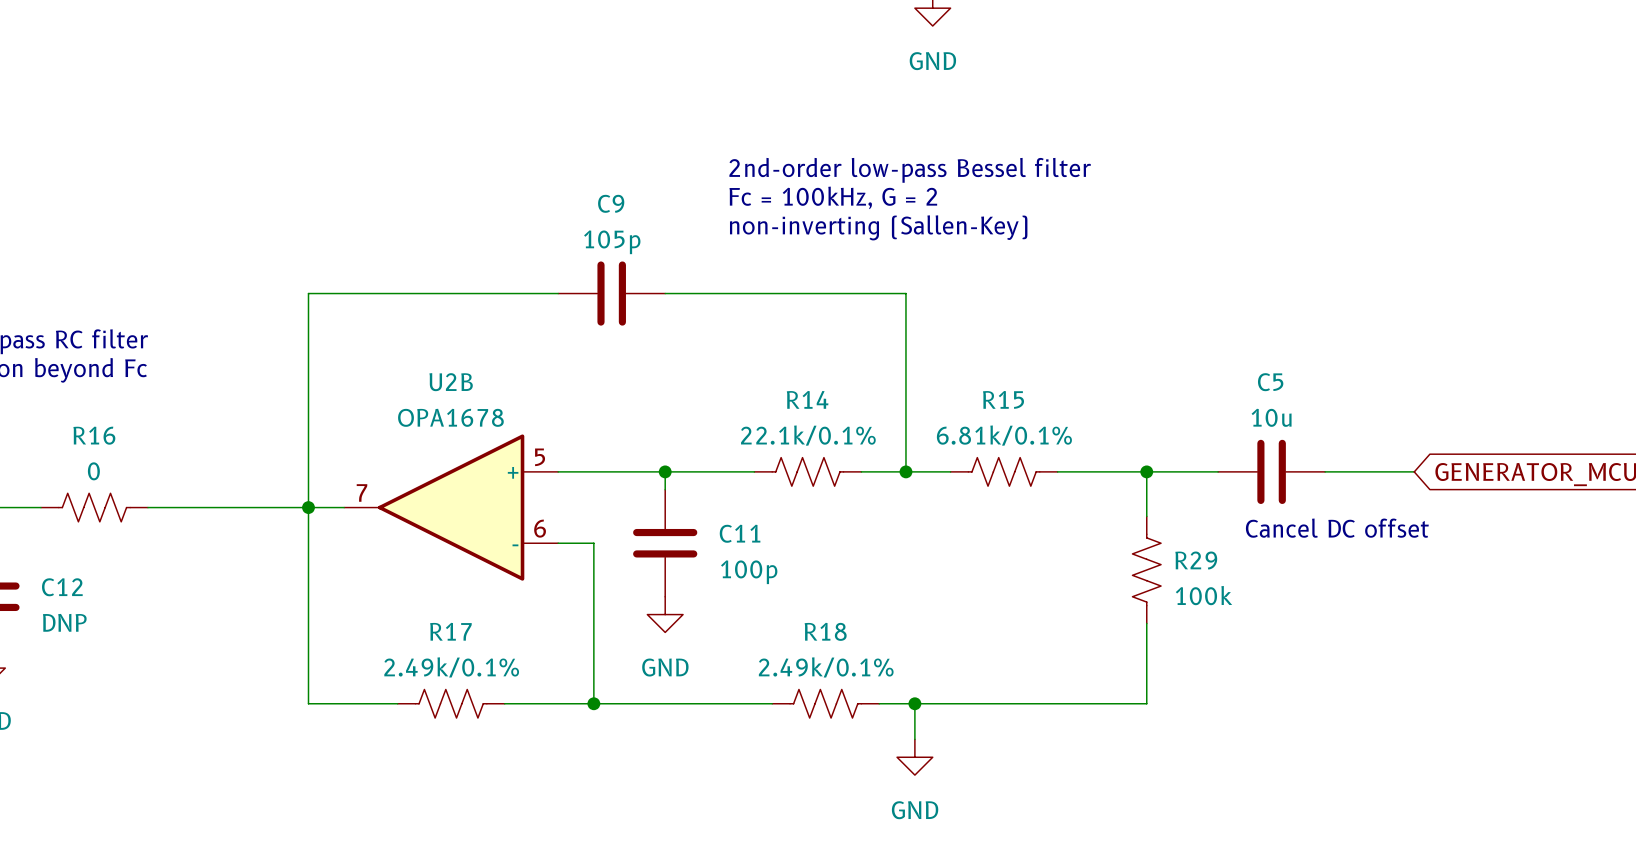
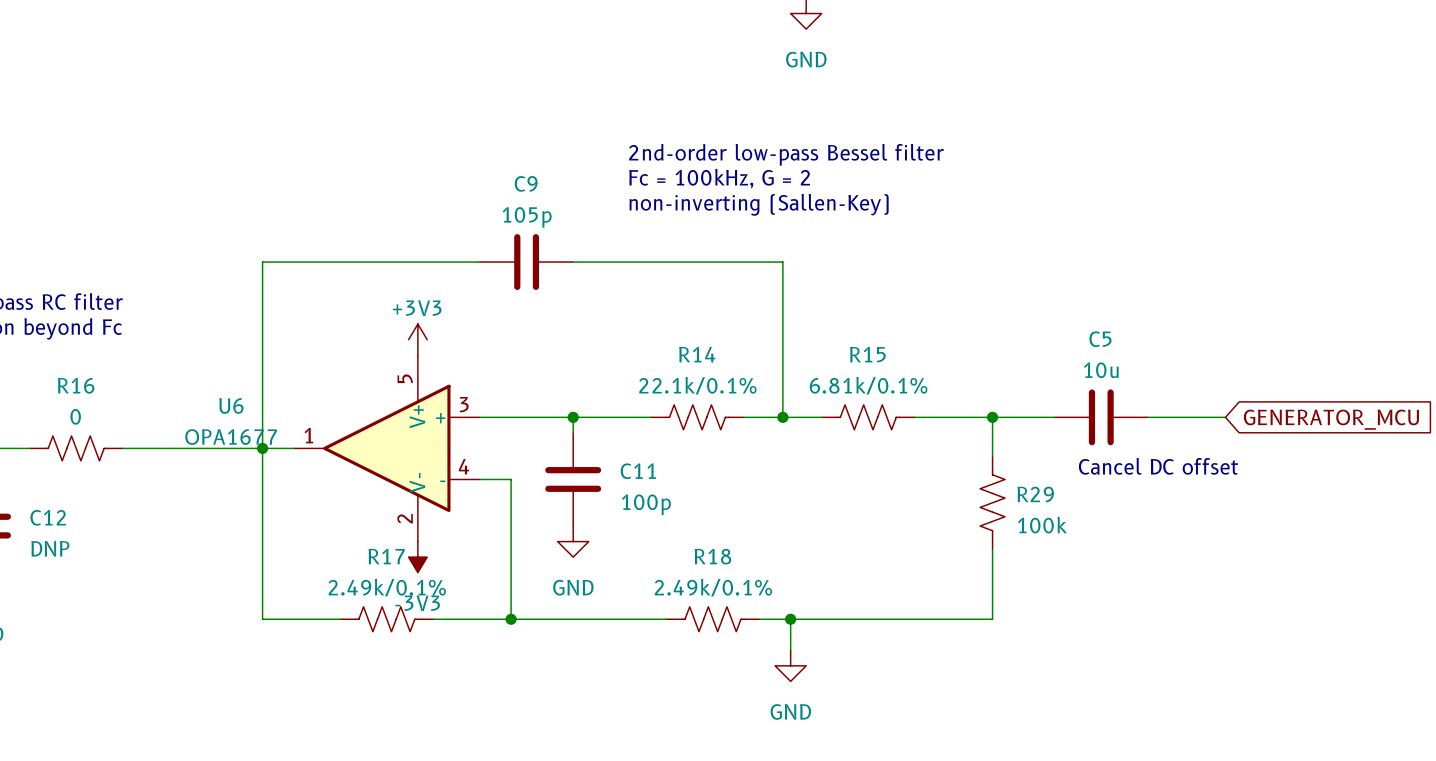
power symbol: none -> +3V3 (417, 339)
U2B: OPA1678 (451, 507) -> none
U6: none -> OPA1677 (386, 448)
power symbol: none -> -3V3 (417, 557)

